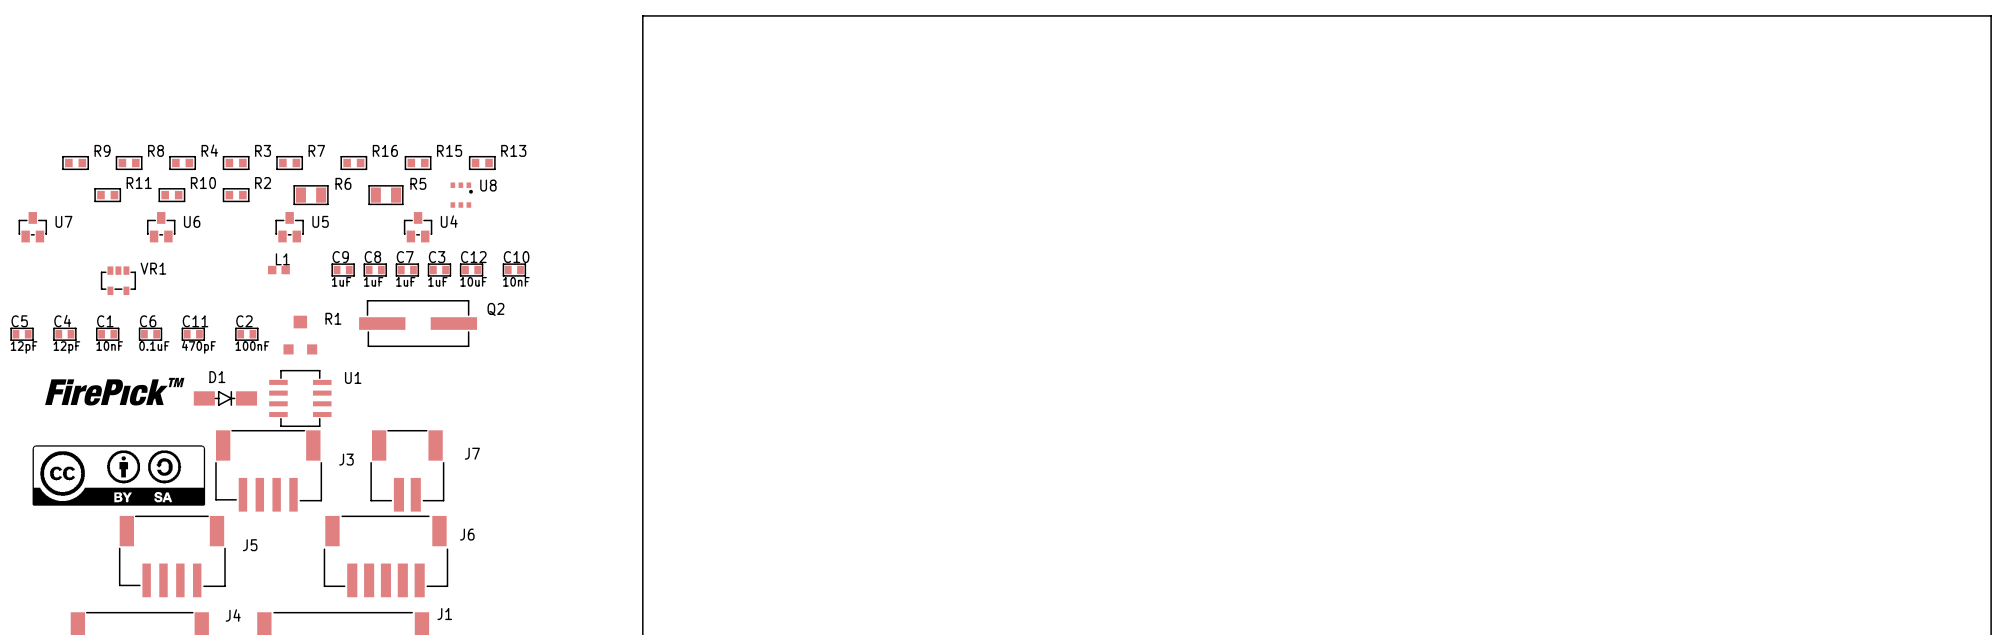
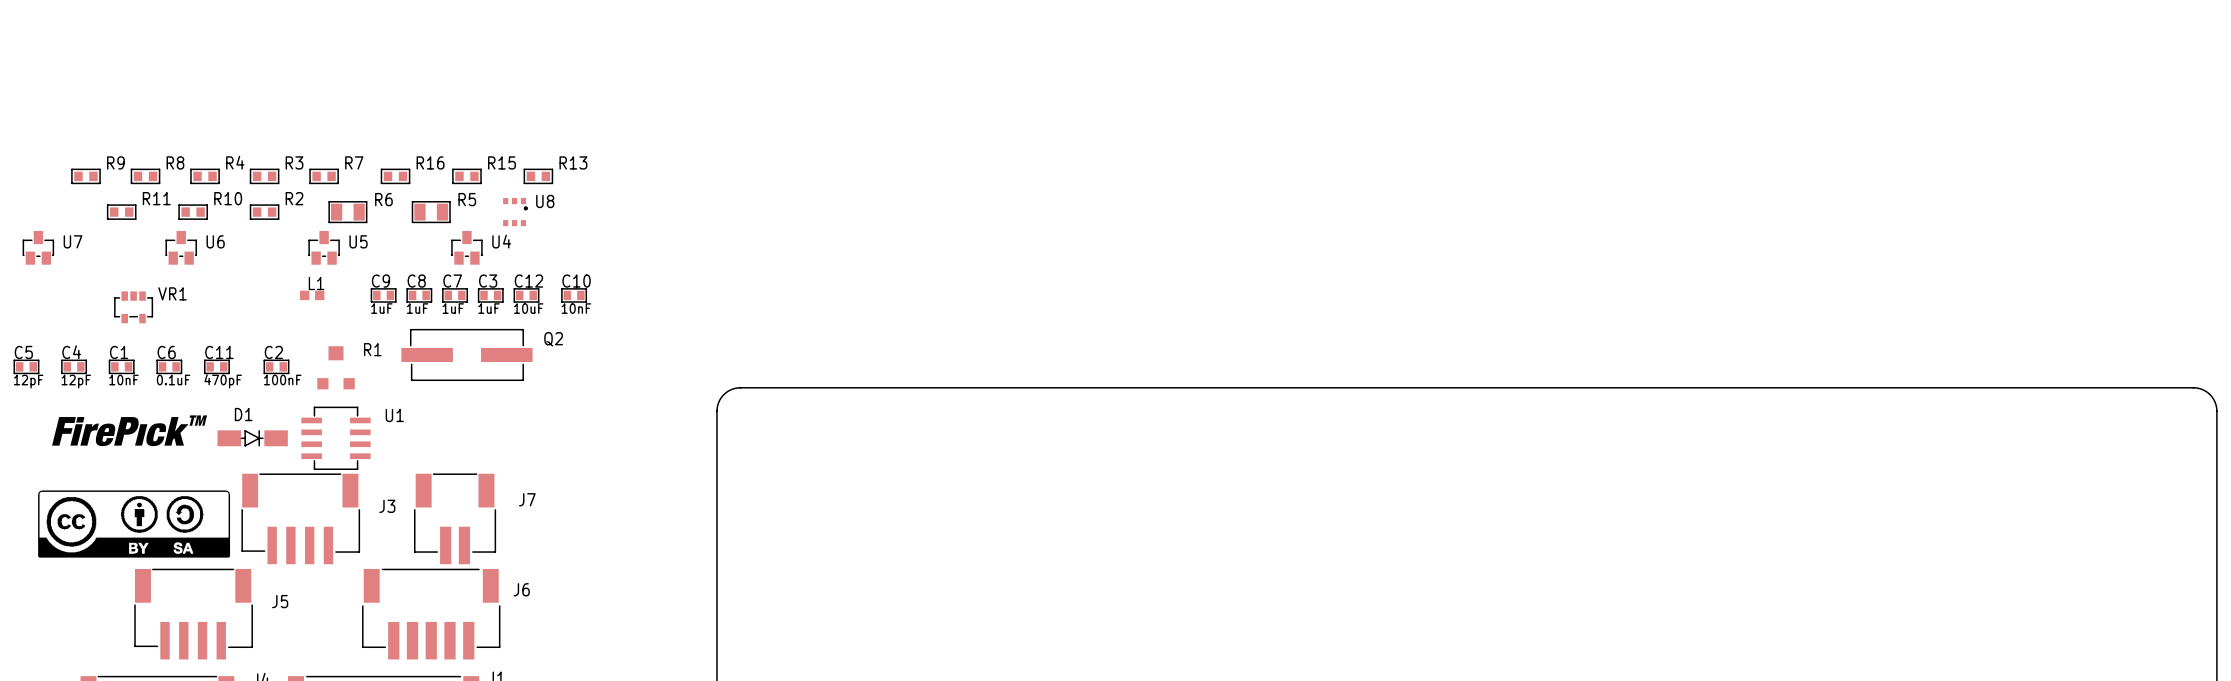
board edge: (642, 374) (642, 15) (1991, 15) (1991, 374) -> (716, 411) (718, 402) (723, 394) (731, 389) (740, 387) (2193, 387) (2202, 389) (2210, 394) (2215, 402) (2216, 411)

